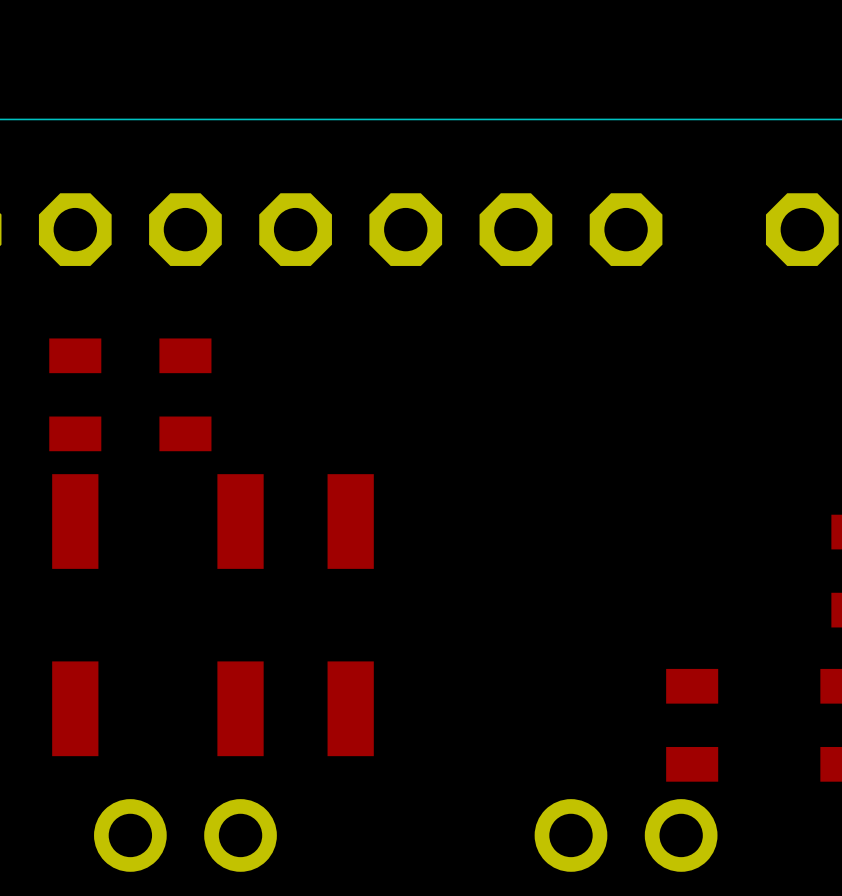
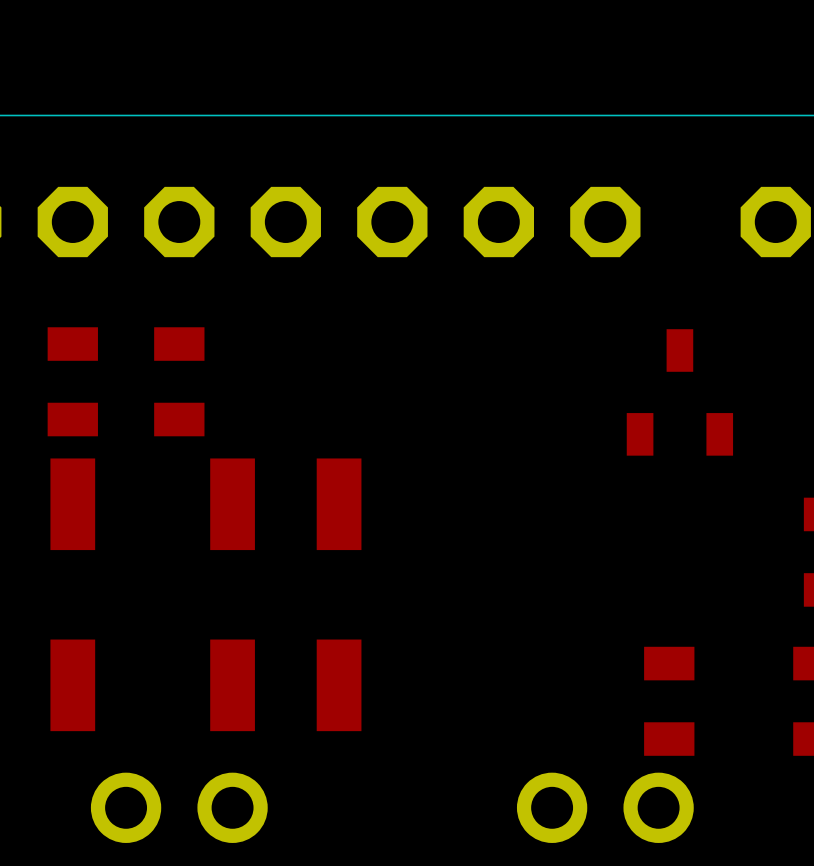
part: none -> (679, 392)

